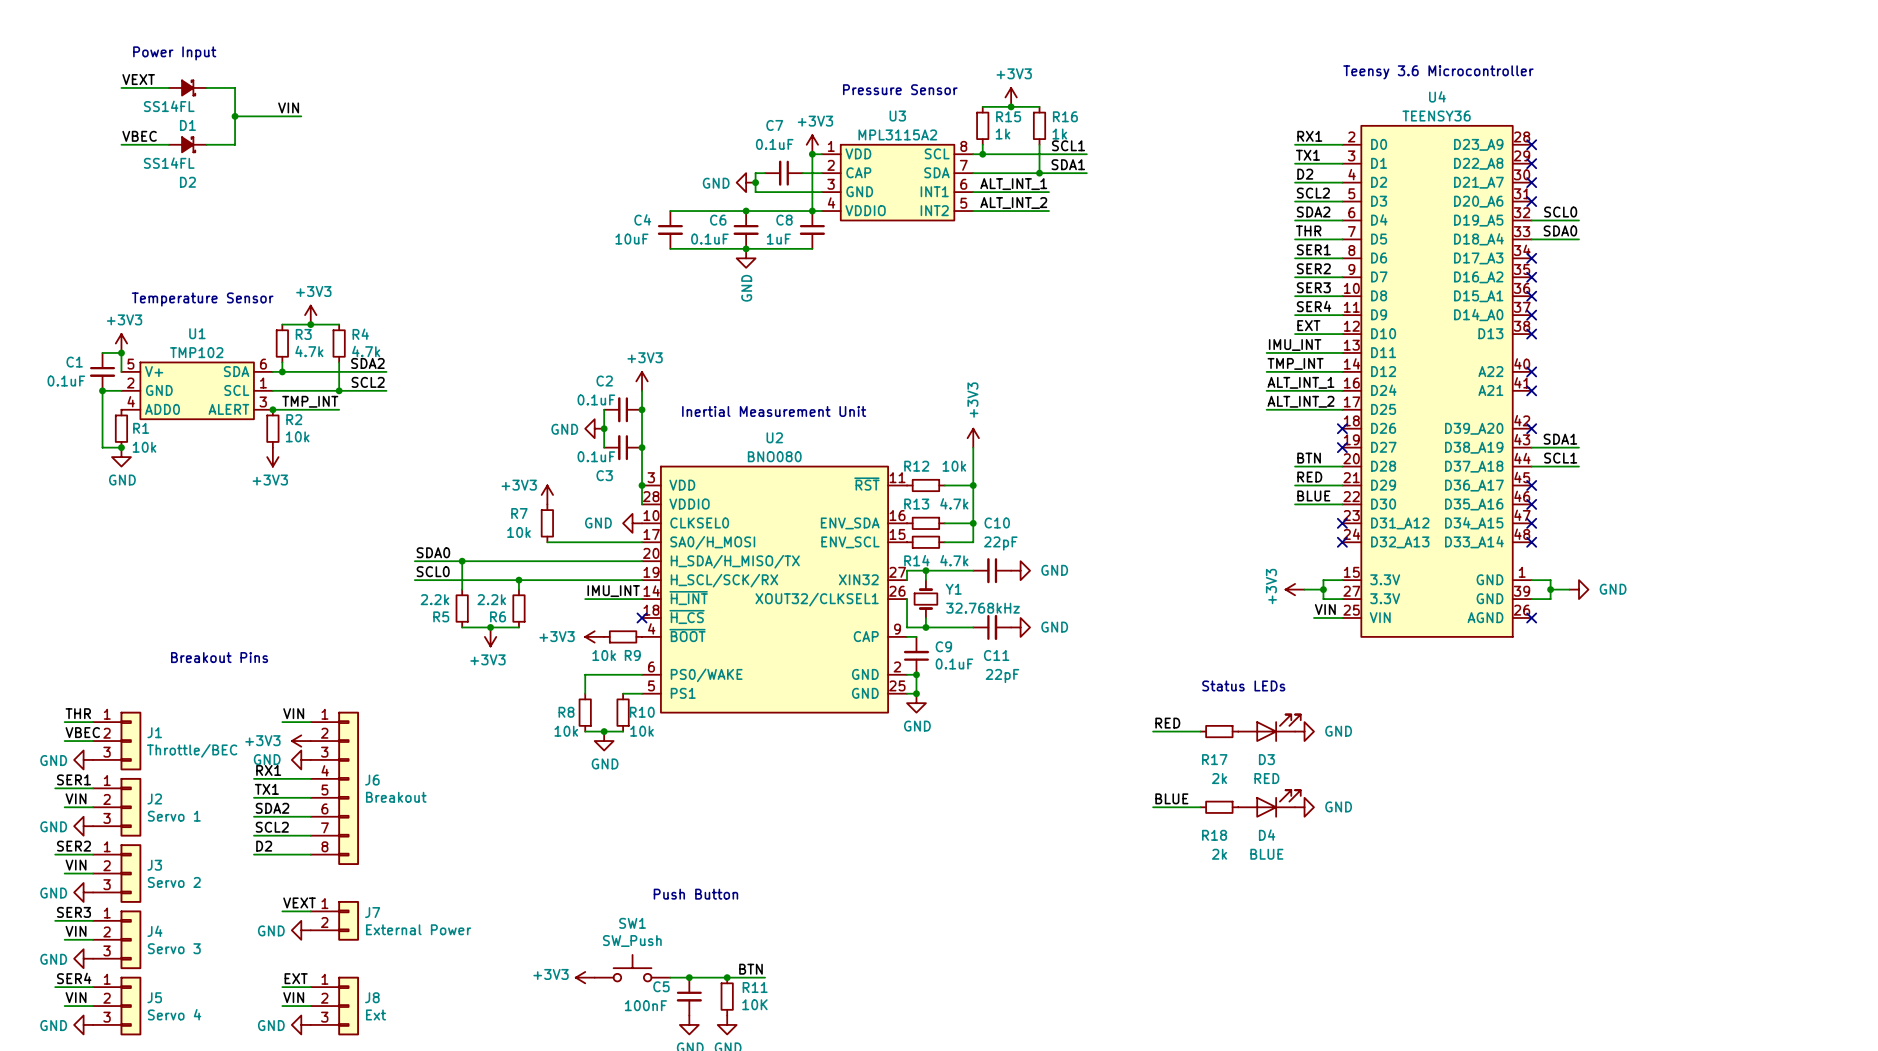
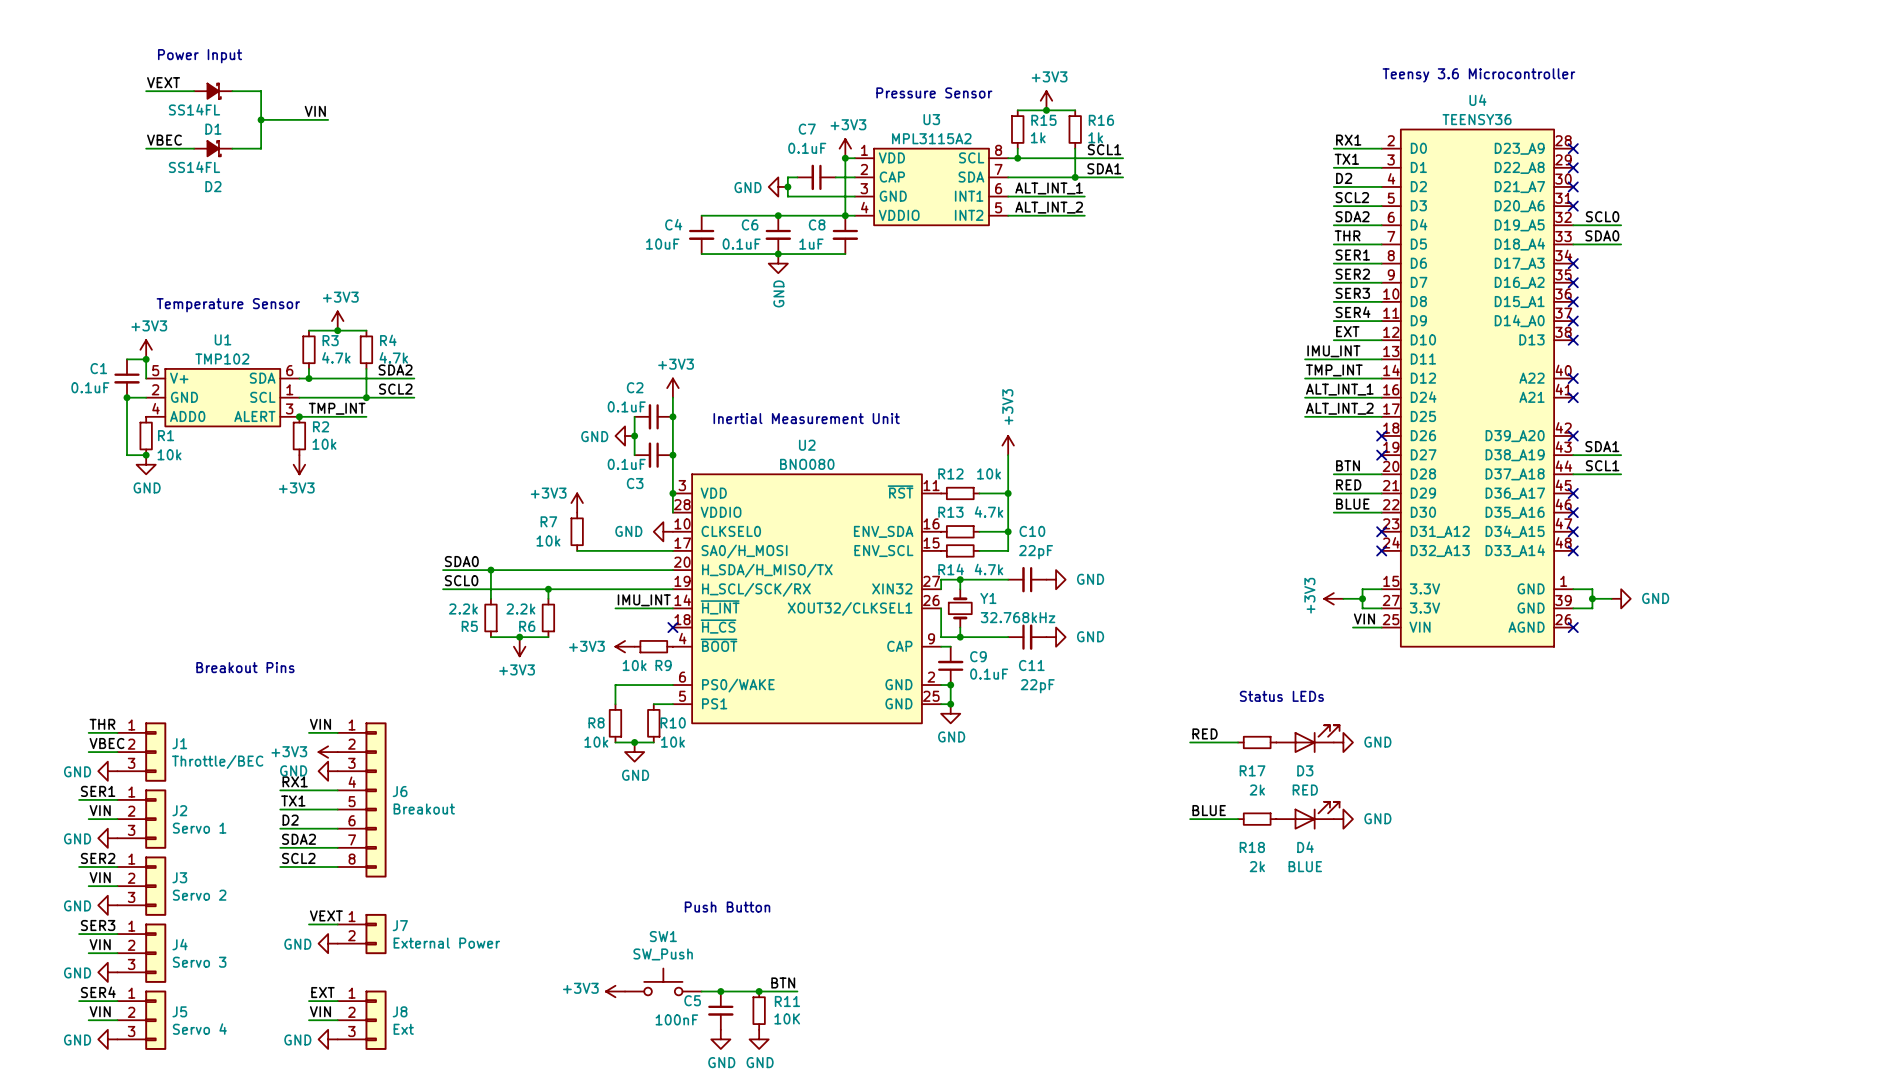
label: SDA2 (272, 808) -> D2 (290, 820)
label: SCL2 (272, 827) -> SDA2 (299, 839)
label: D2 (264, 846) -> SCL2 (298, 858)

